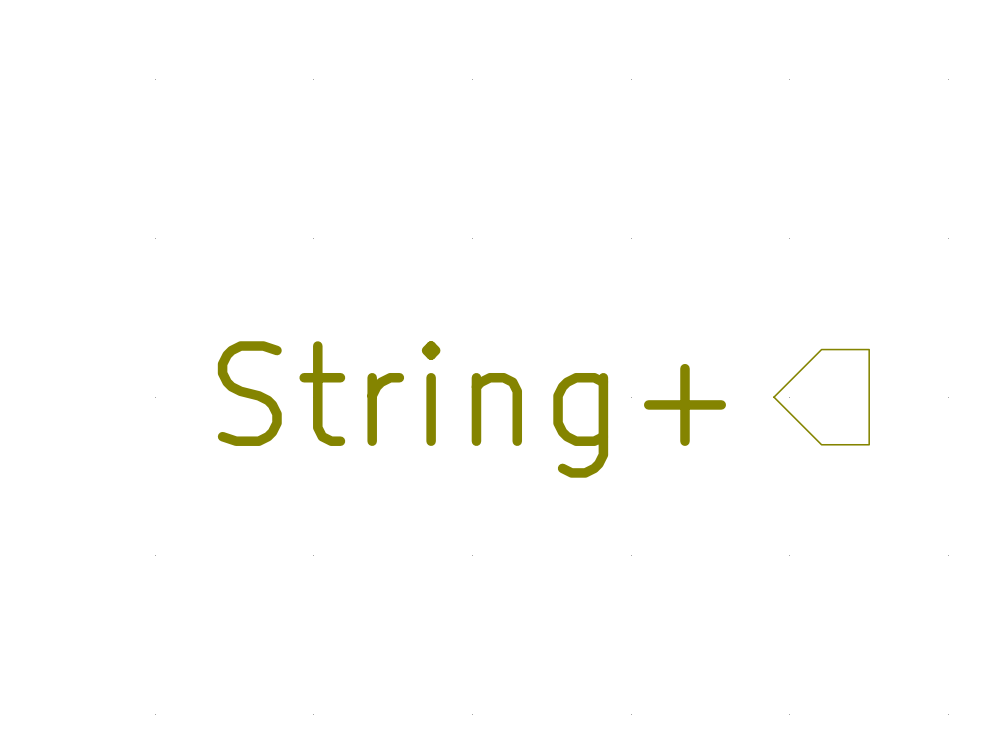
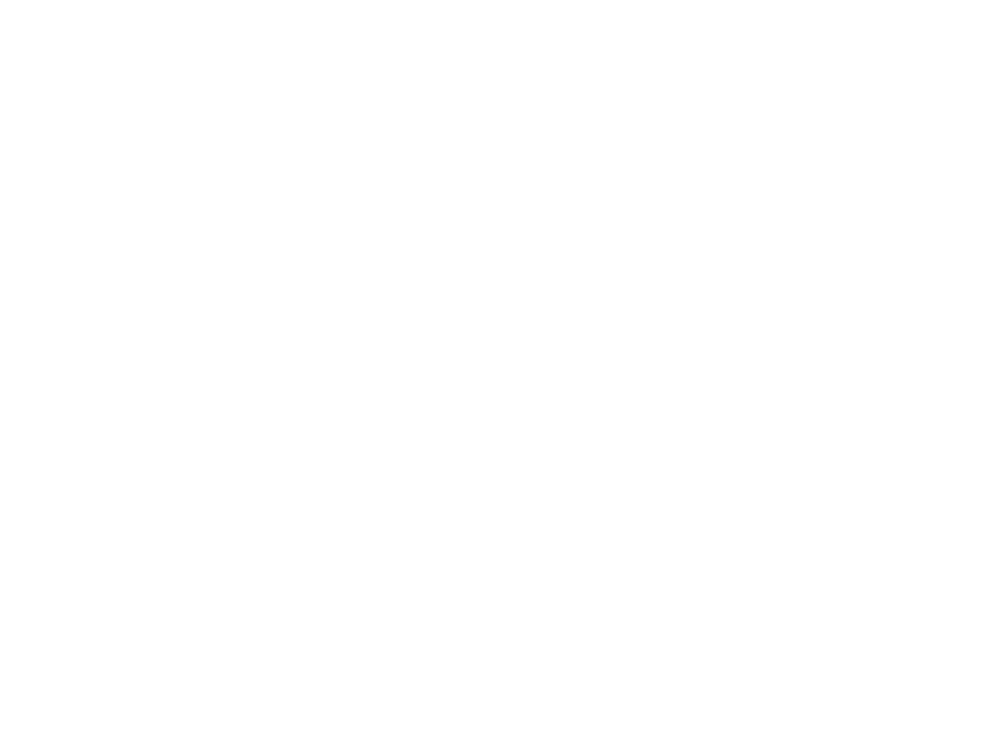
hierarchical label: String+ (471, 409) -> none

